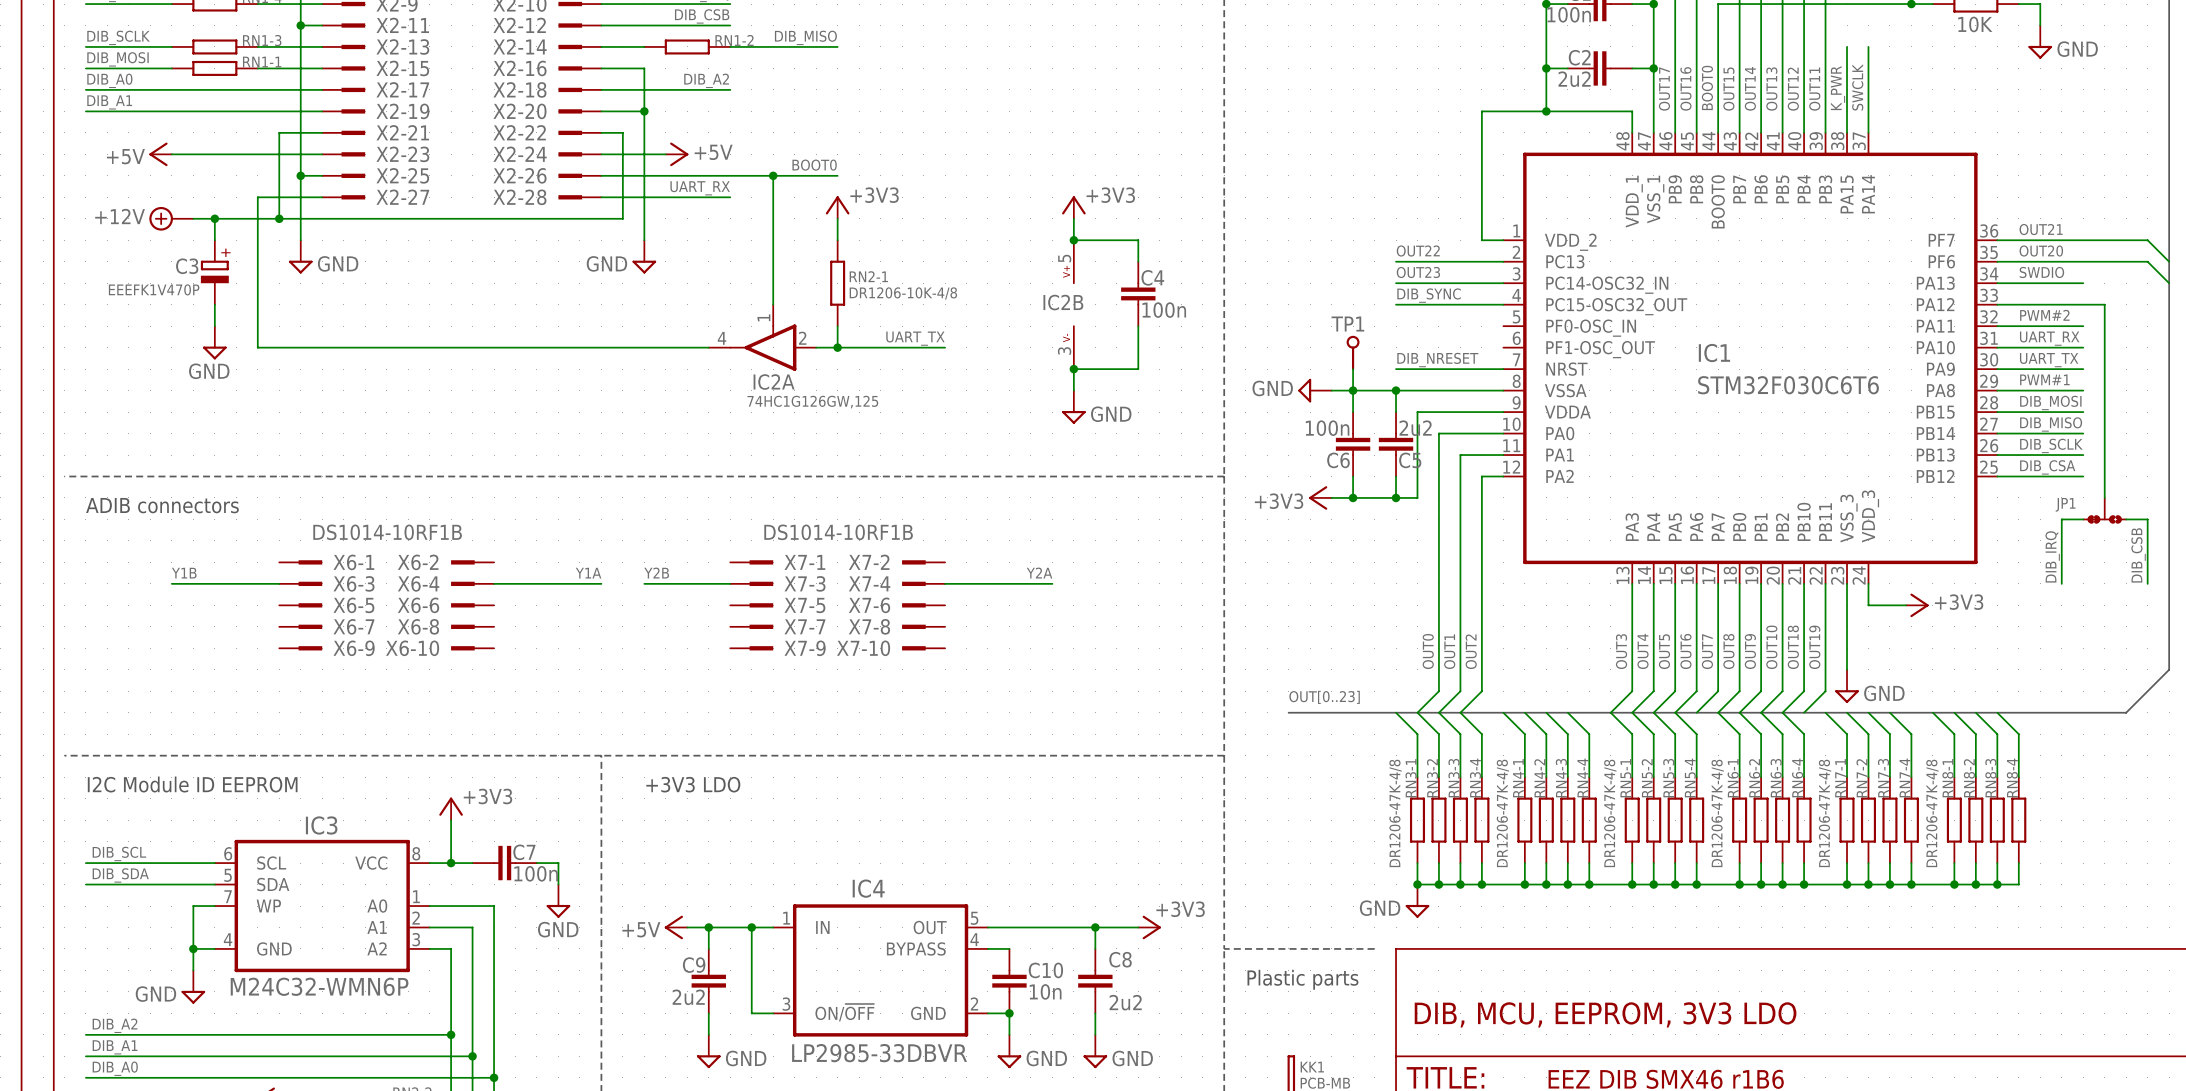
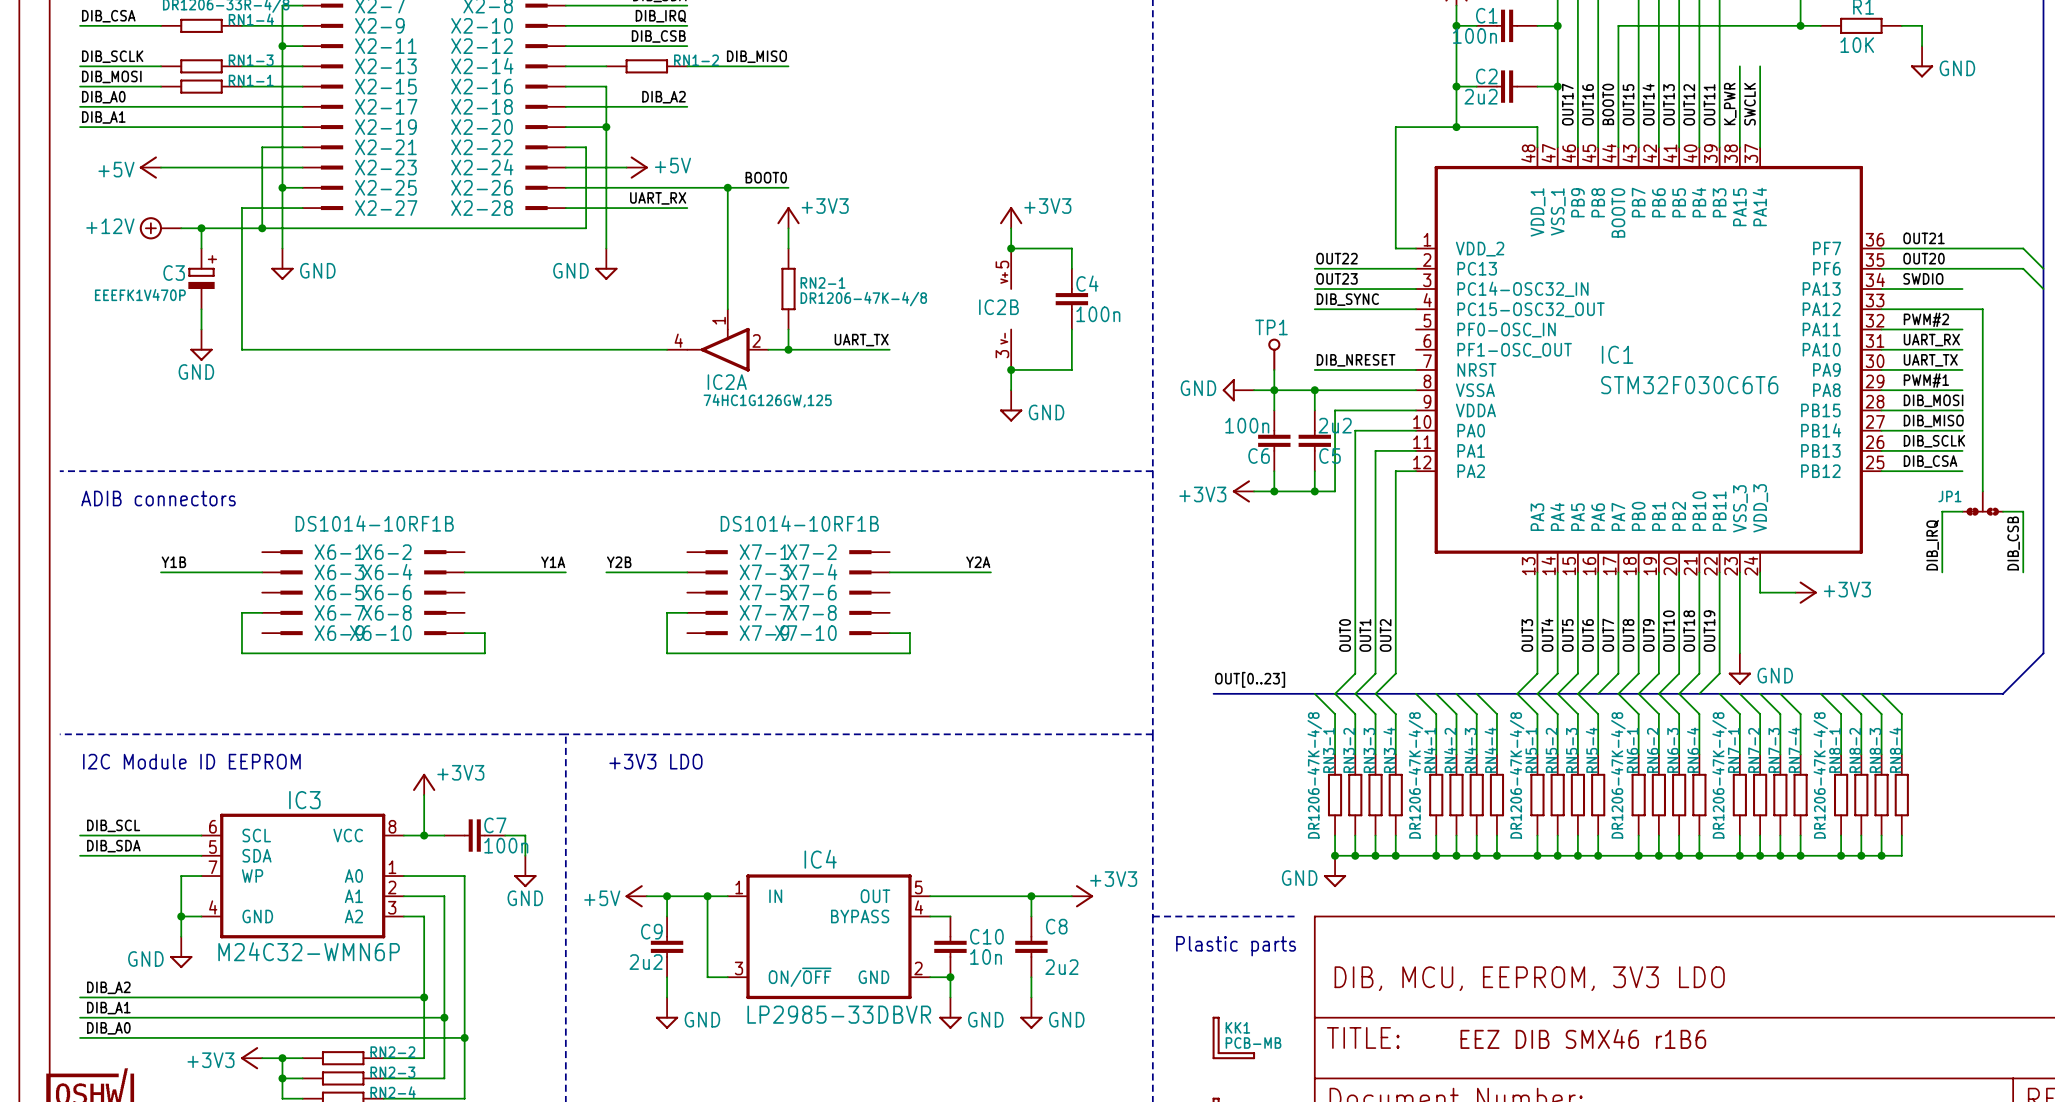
RN2-1 value: DR1206-10K-4/8 (903, 293) -> DR1206-47K-4/8 (863, 299)
wire: none -> (262, 612) (241, 612) (241, 653) (484, 653) (484, 633) (464, 633)
wire: none -> (687, 612) (667, 612) (667, 653) (909, 653) (909, 633) (889, 633)

